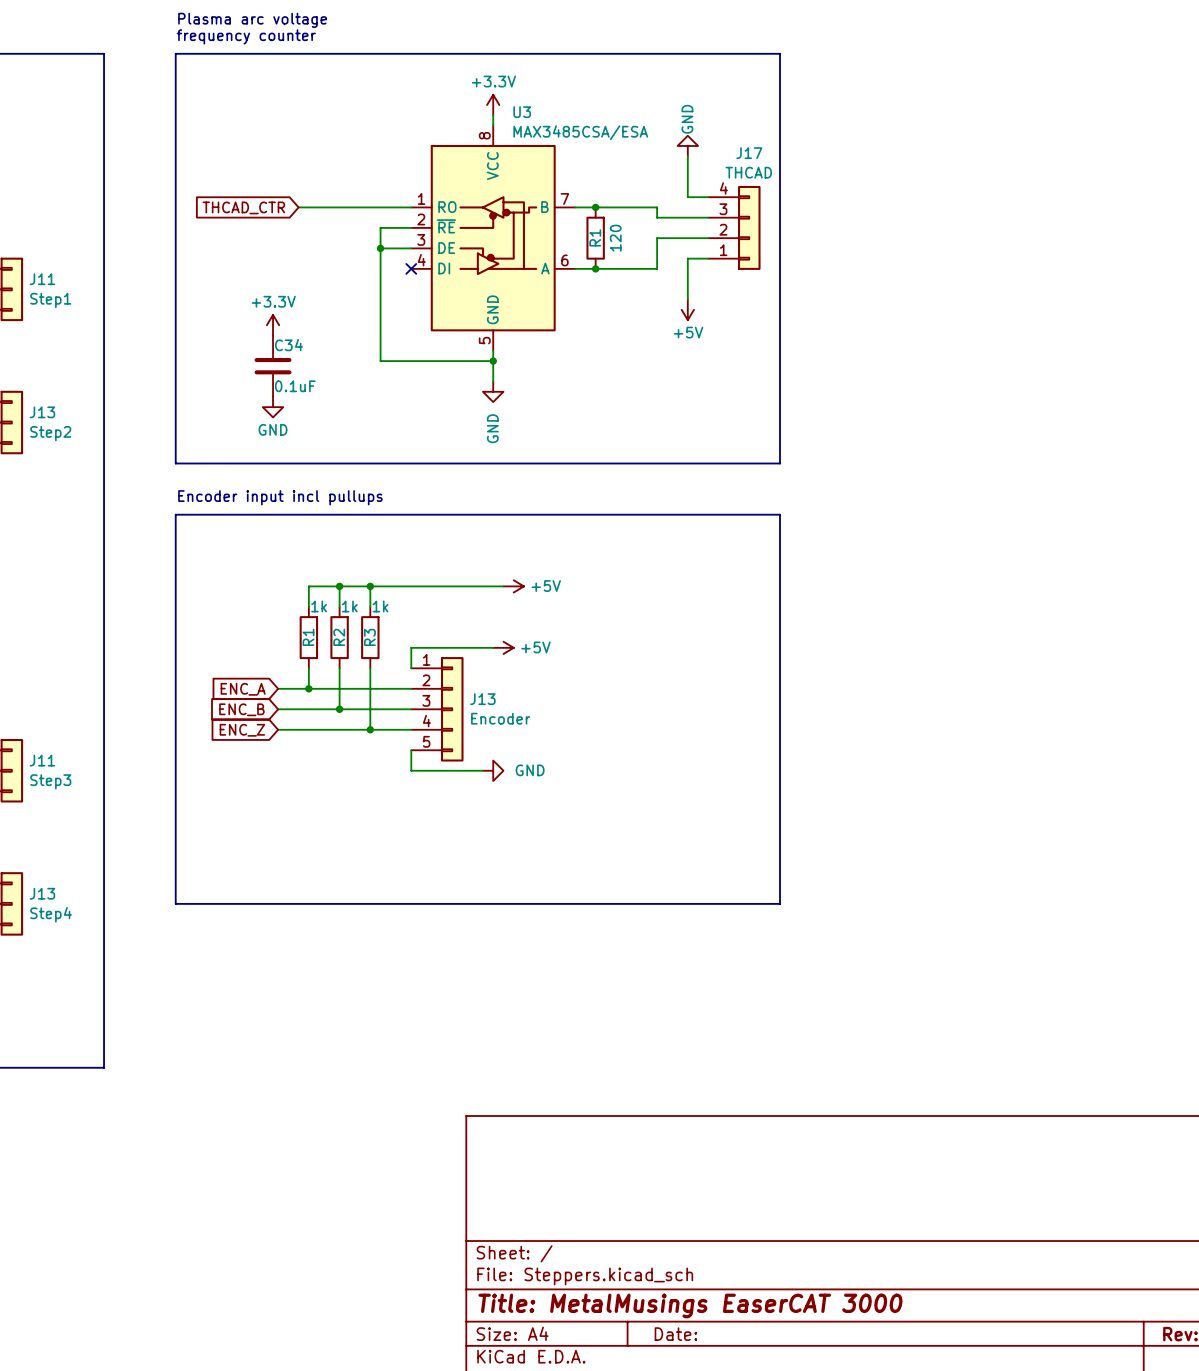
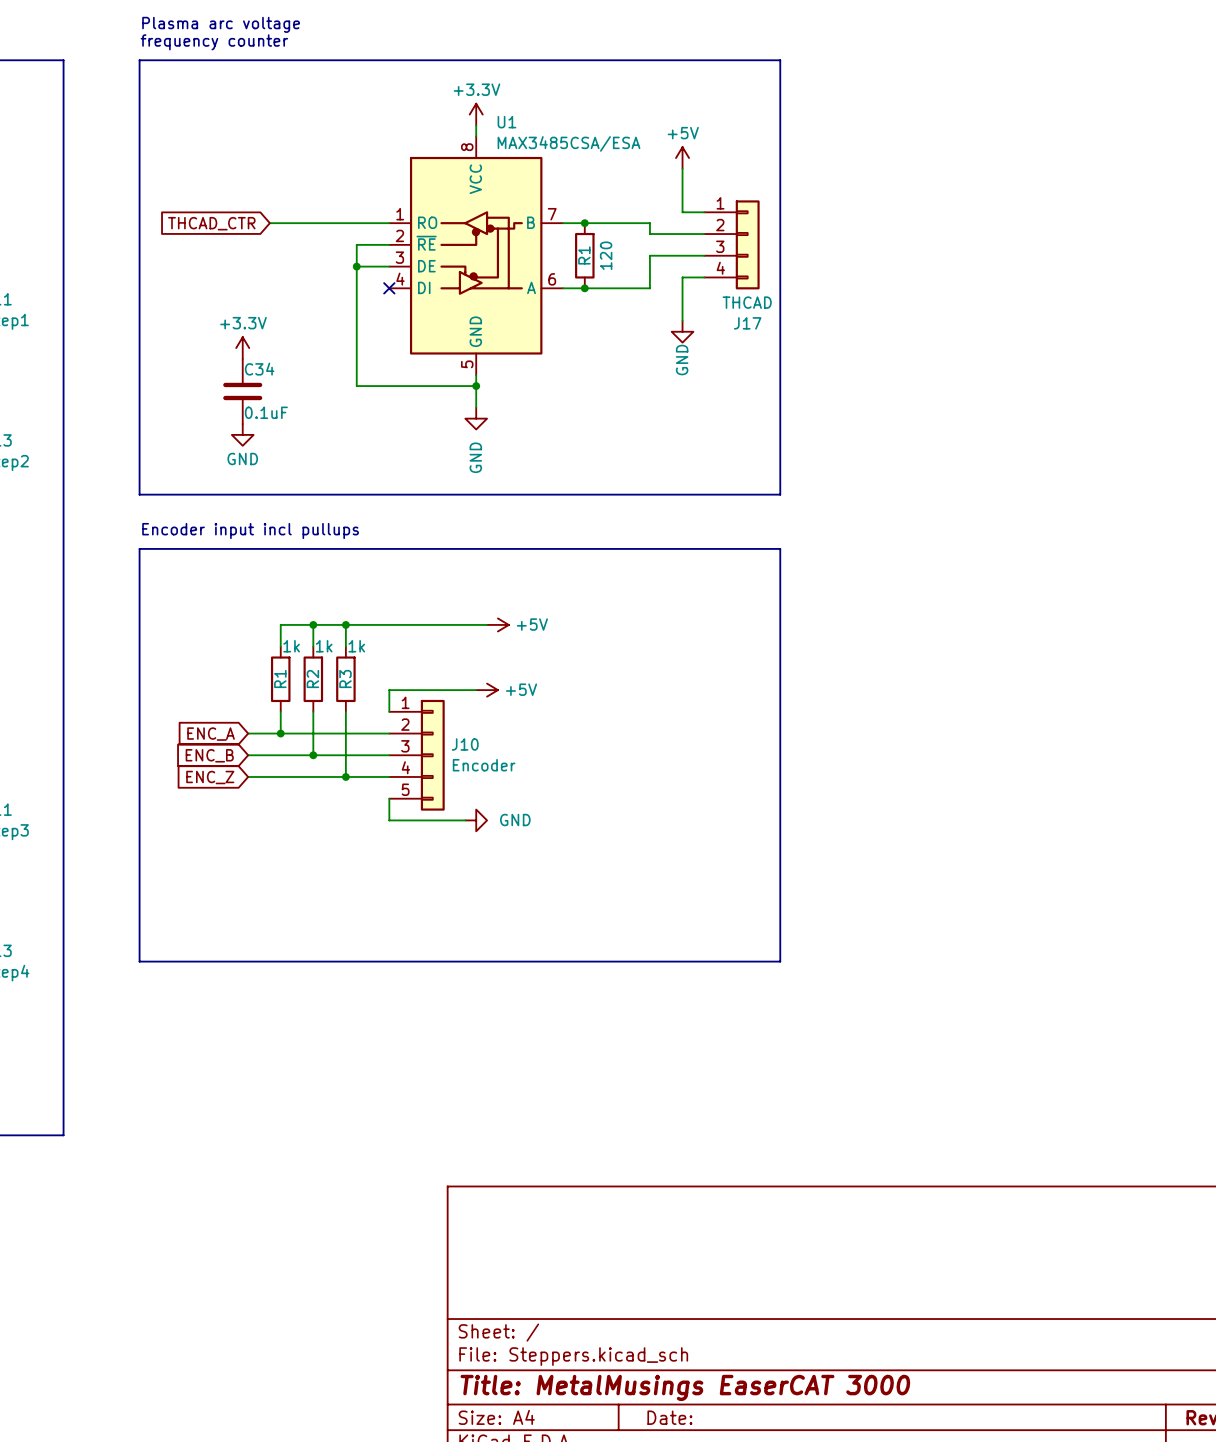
U3 name: U3 (522, 112) -> U1 (506, 122)
power symbol: GND (687, 145) -> +5V (682, 158)
J17 flip: as is (749, 227) -> up-down (747, 244)
power symbol: +5V (687, 309) -> GND (682, 331)
J13 name: J13 (482, 699) -> J10 (465, 744)

